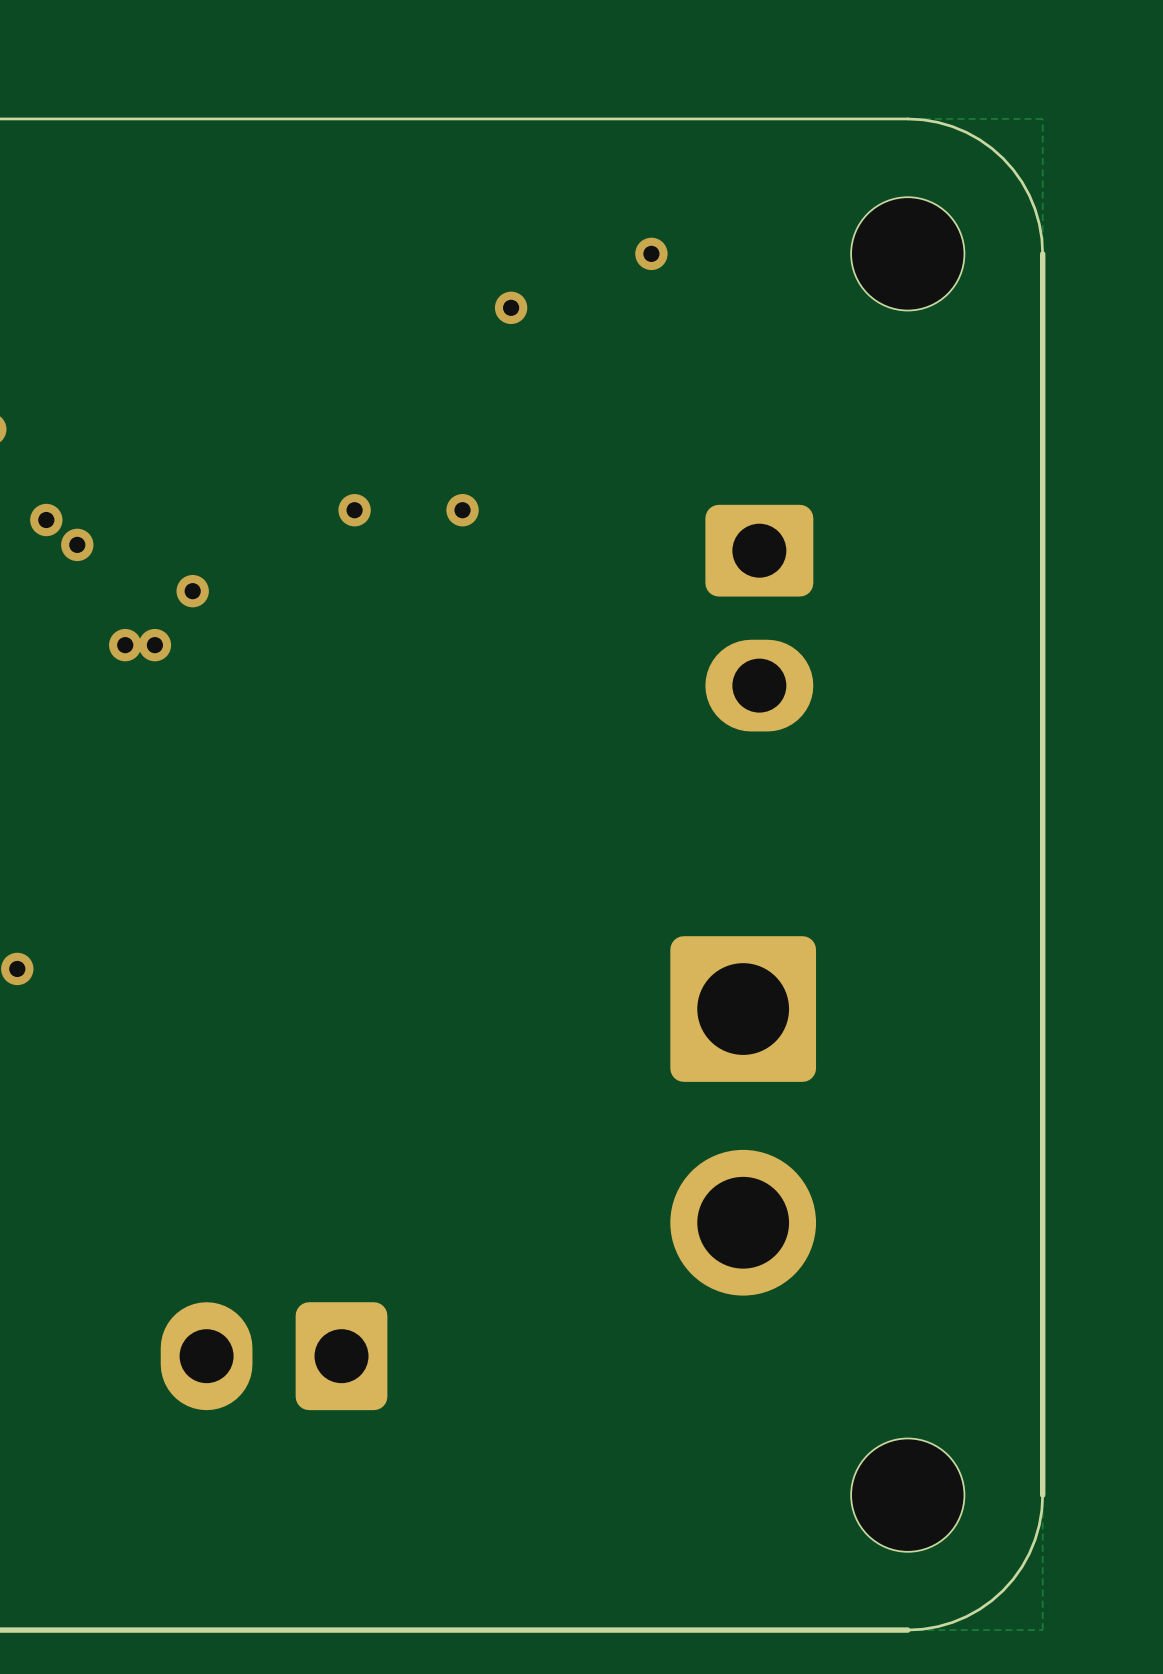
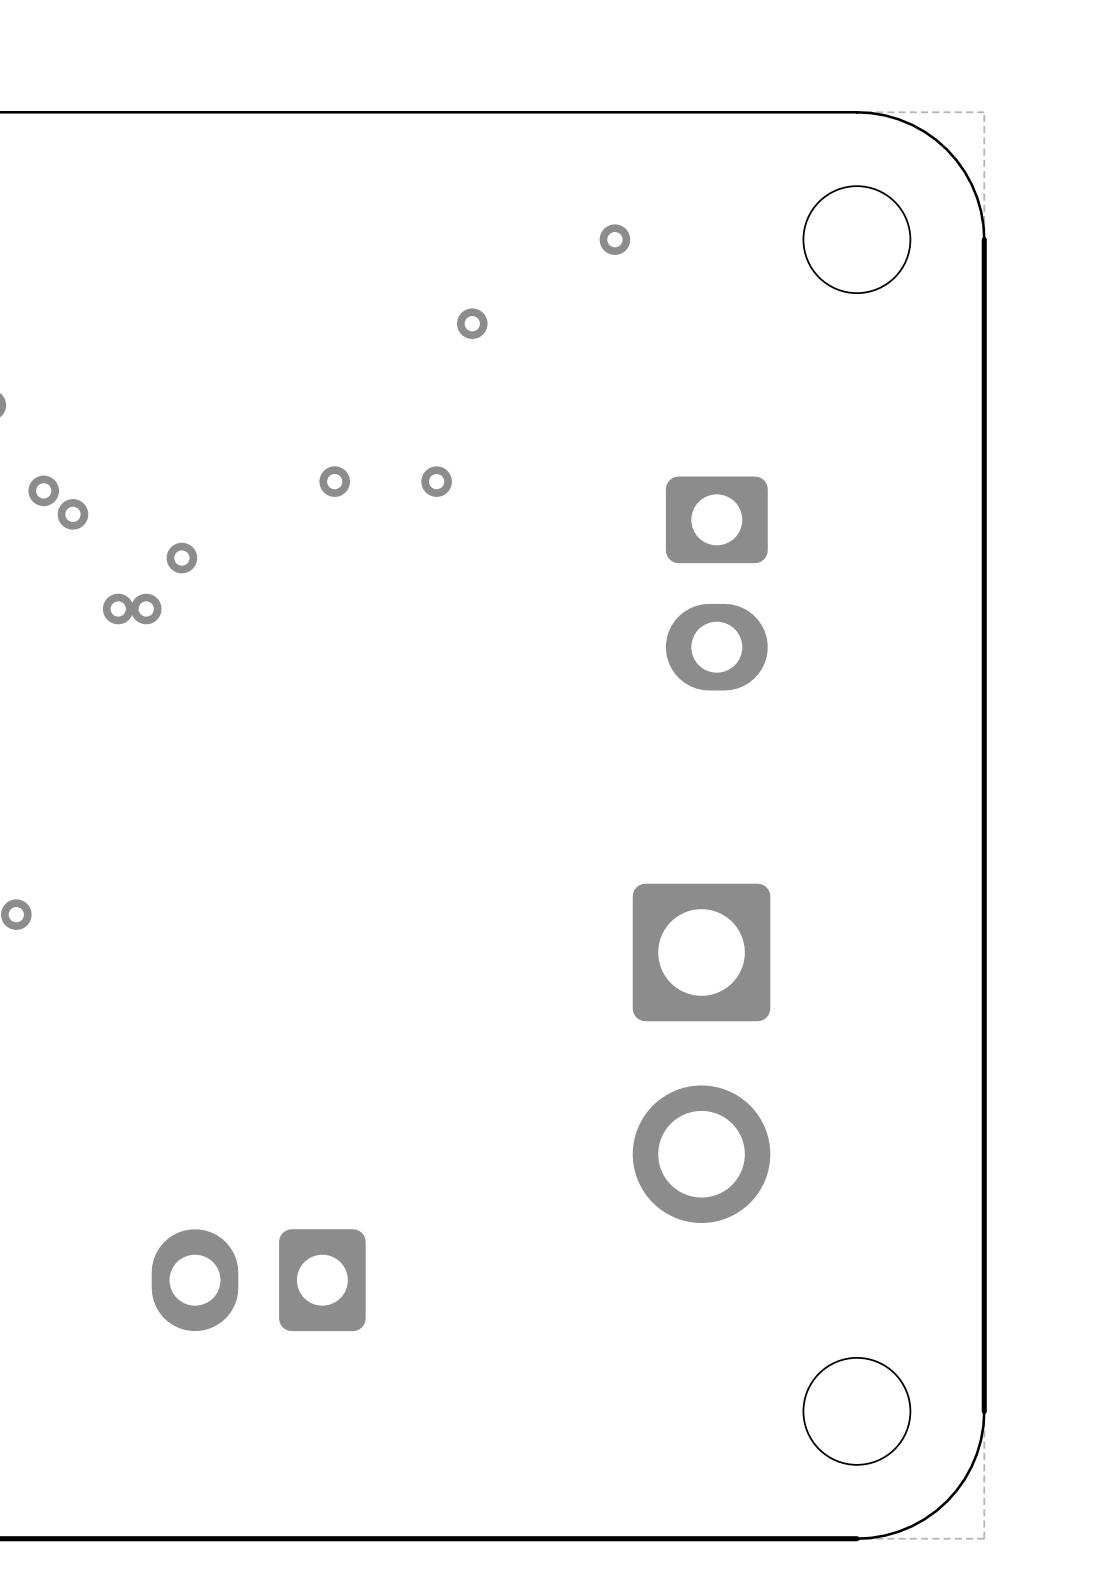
via position: (511, 307) -> (472, 323)

